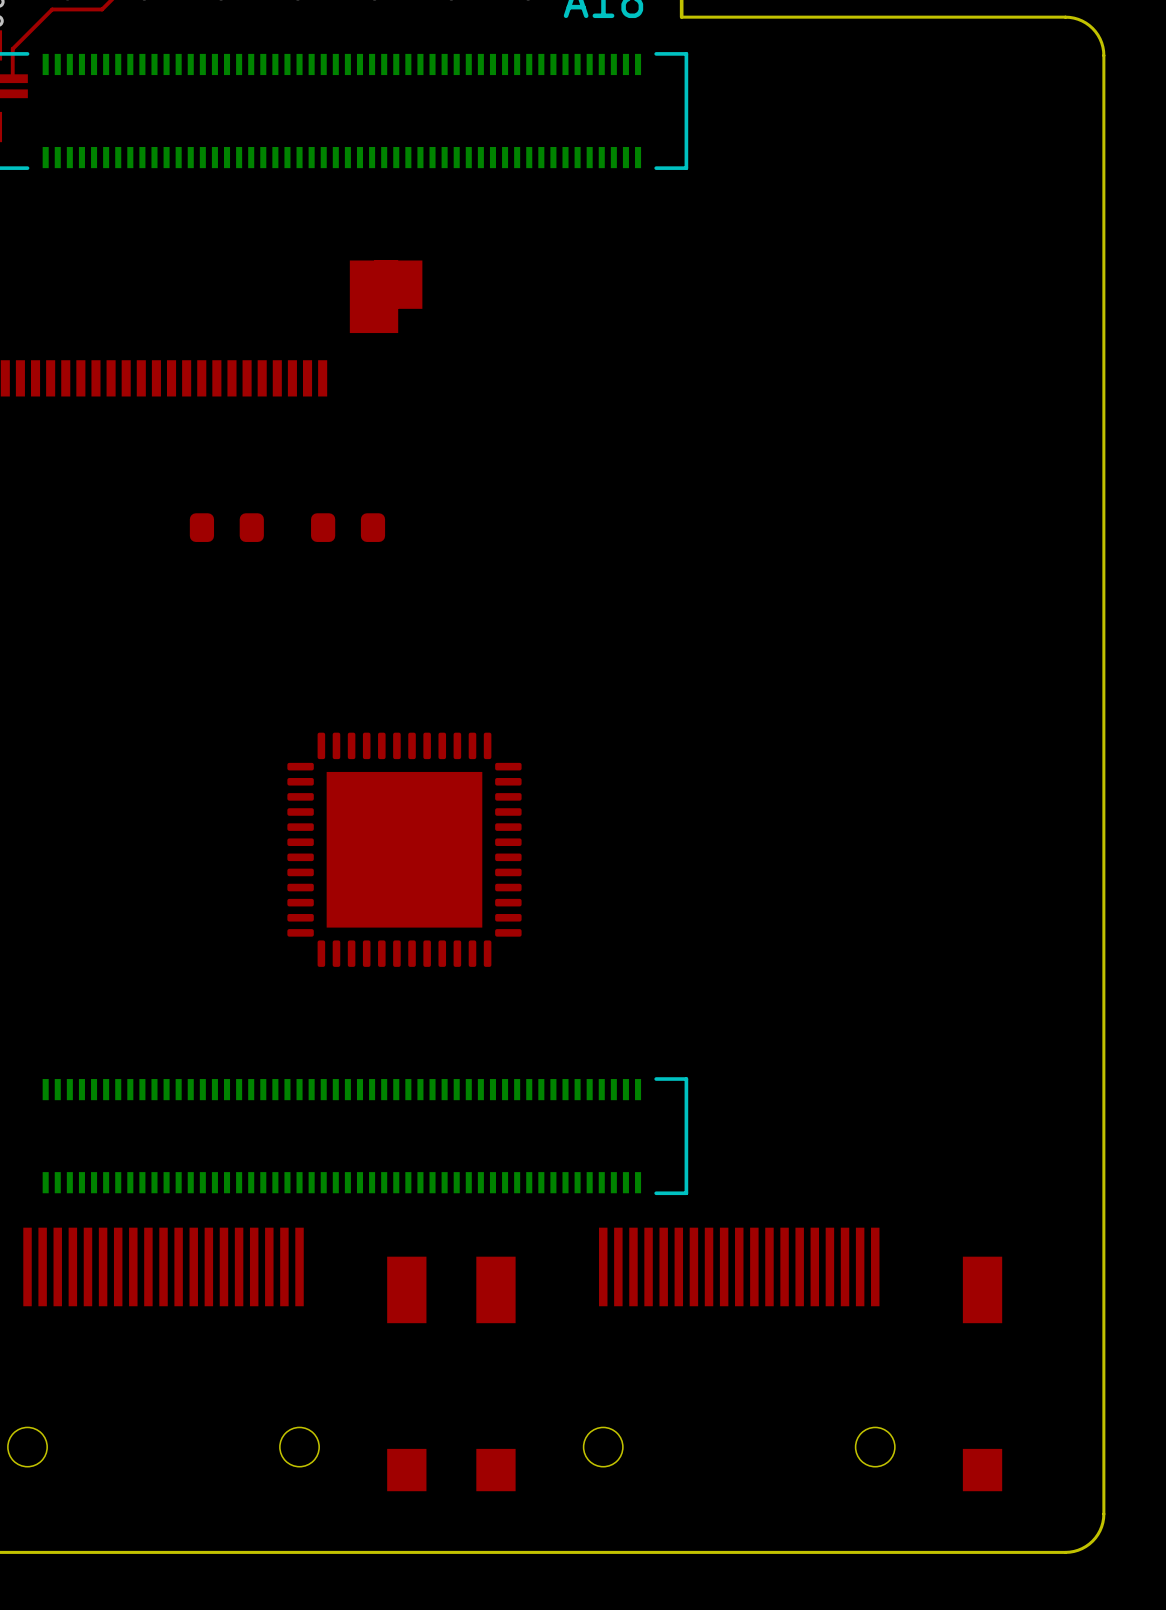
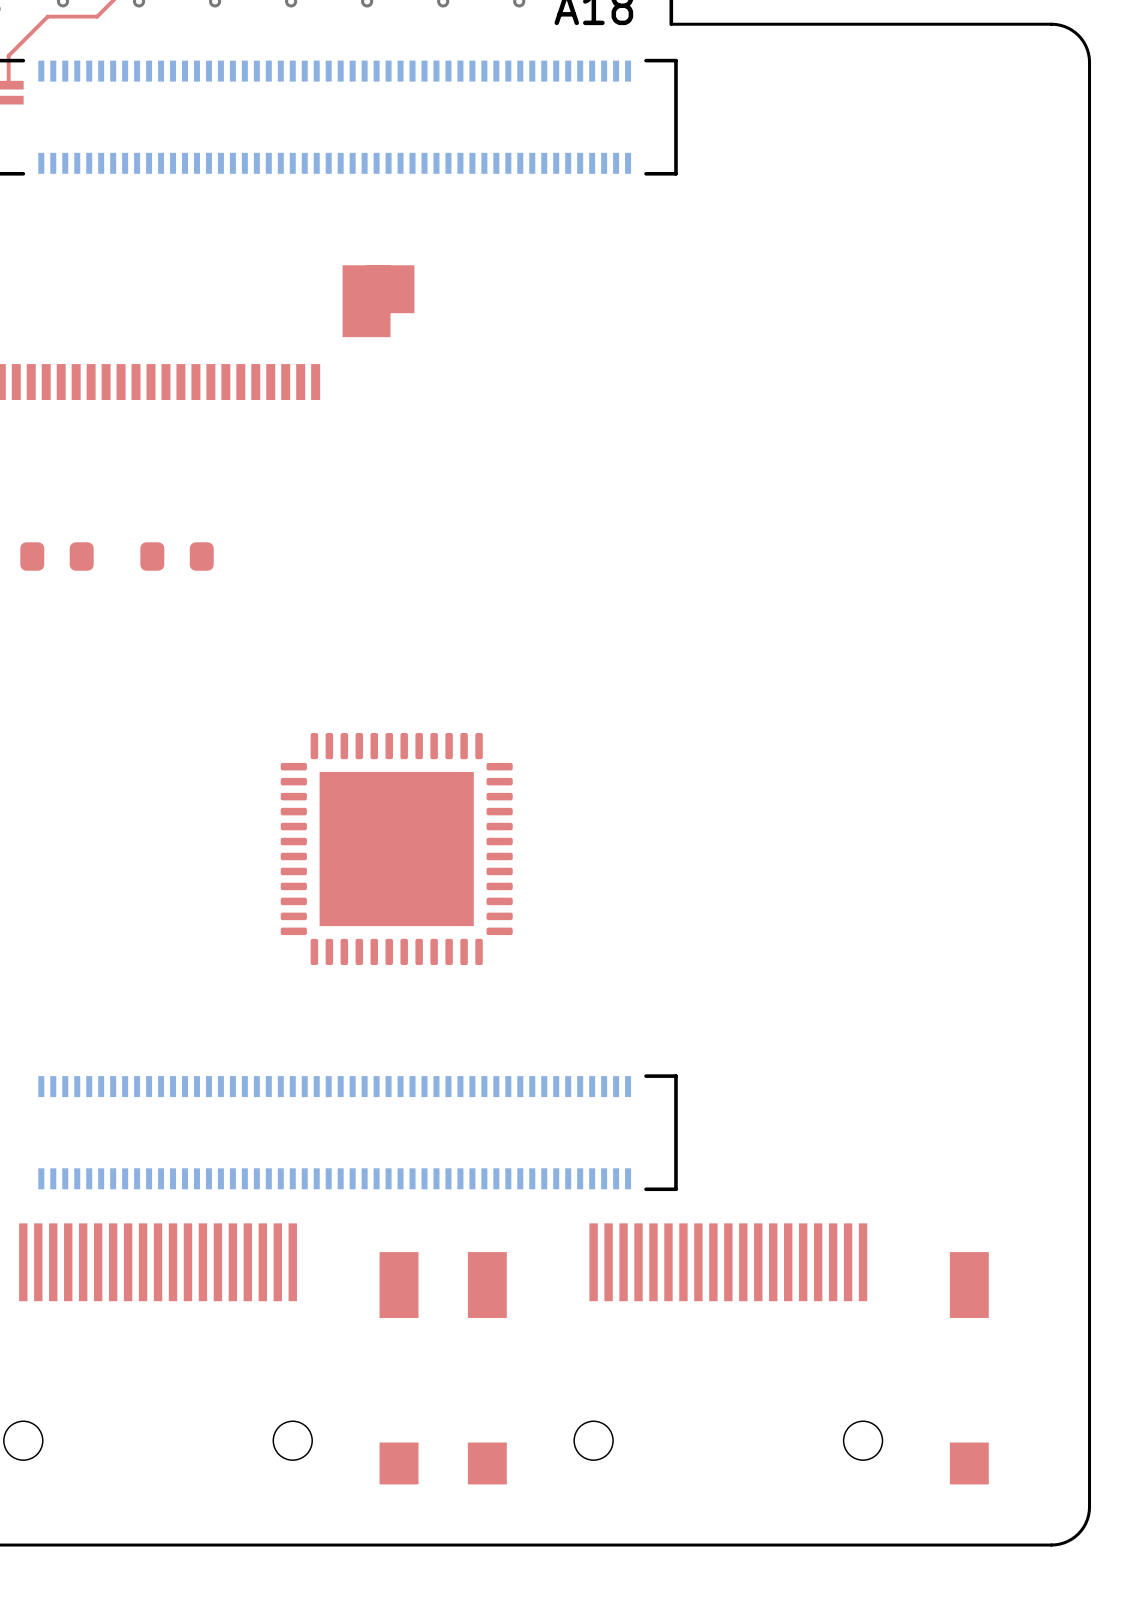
part position: (226, 527) -> (177, 556)
part: (348, 527) -> none
part: none -> (56, 556)

